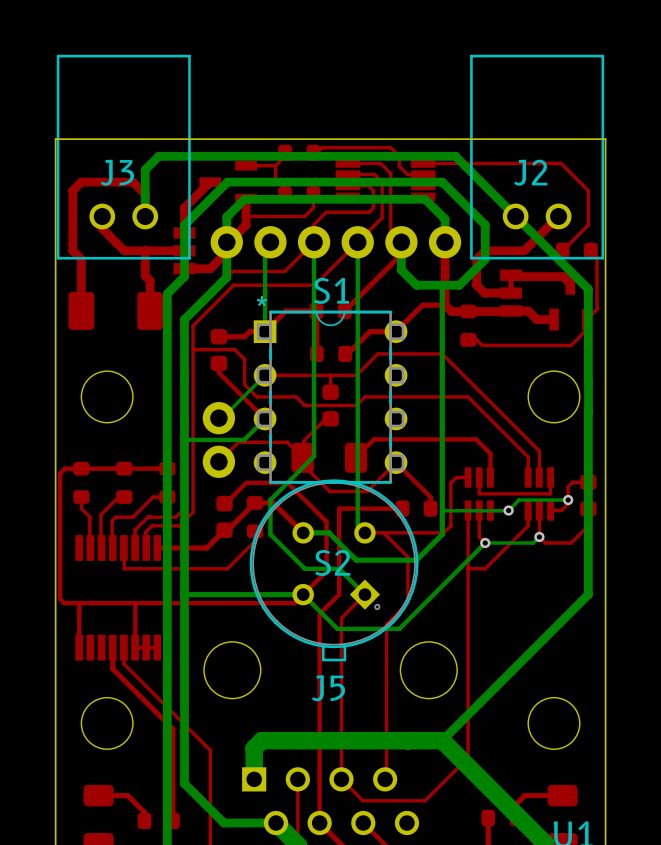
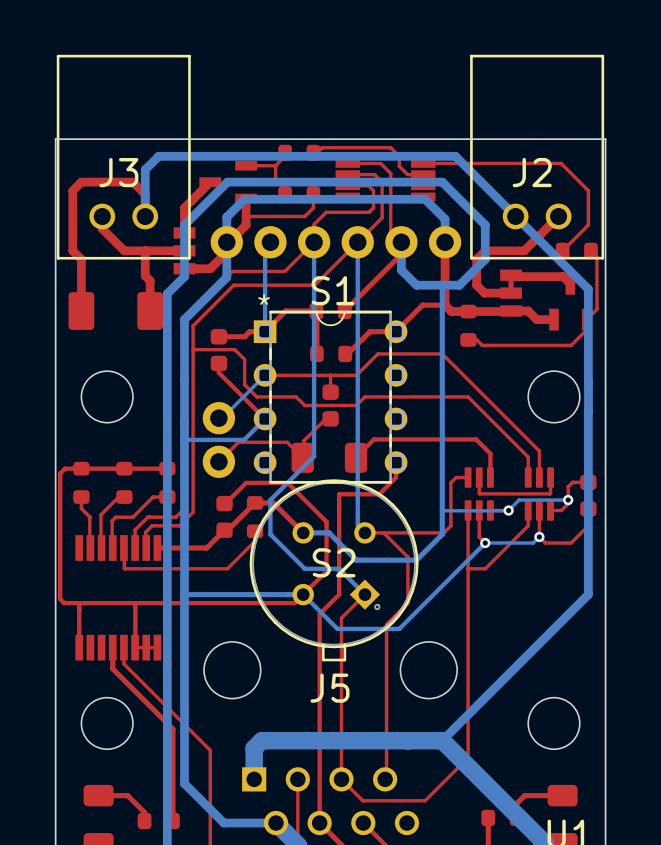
top track: (299, 461) (329, 491) (367, 491) (396, 462) -> none
top track: (400, 467) (430, 497) (430, 508) -> none
top track: (402, 508) (339, 508) -> (396, 462) (396, 477) (379, 494) (339, 494) (339, 508)
part: (416, 508) -> none

